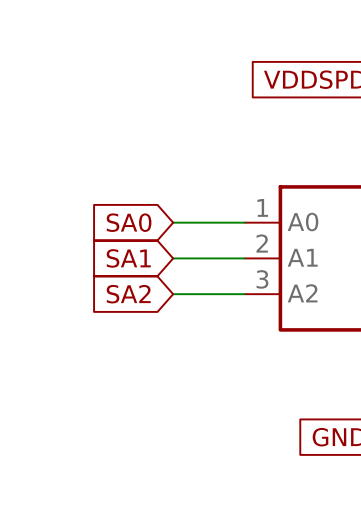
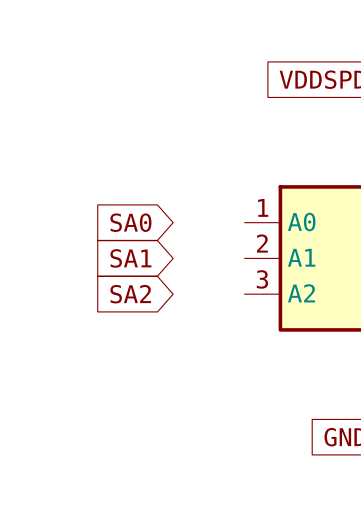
wire: (173, 222) (244, 222) -> none
wire: (173, 258) (244, 258) -> none
wire: (173, 294) (244, 294) -> none

